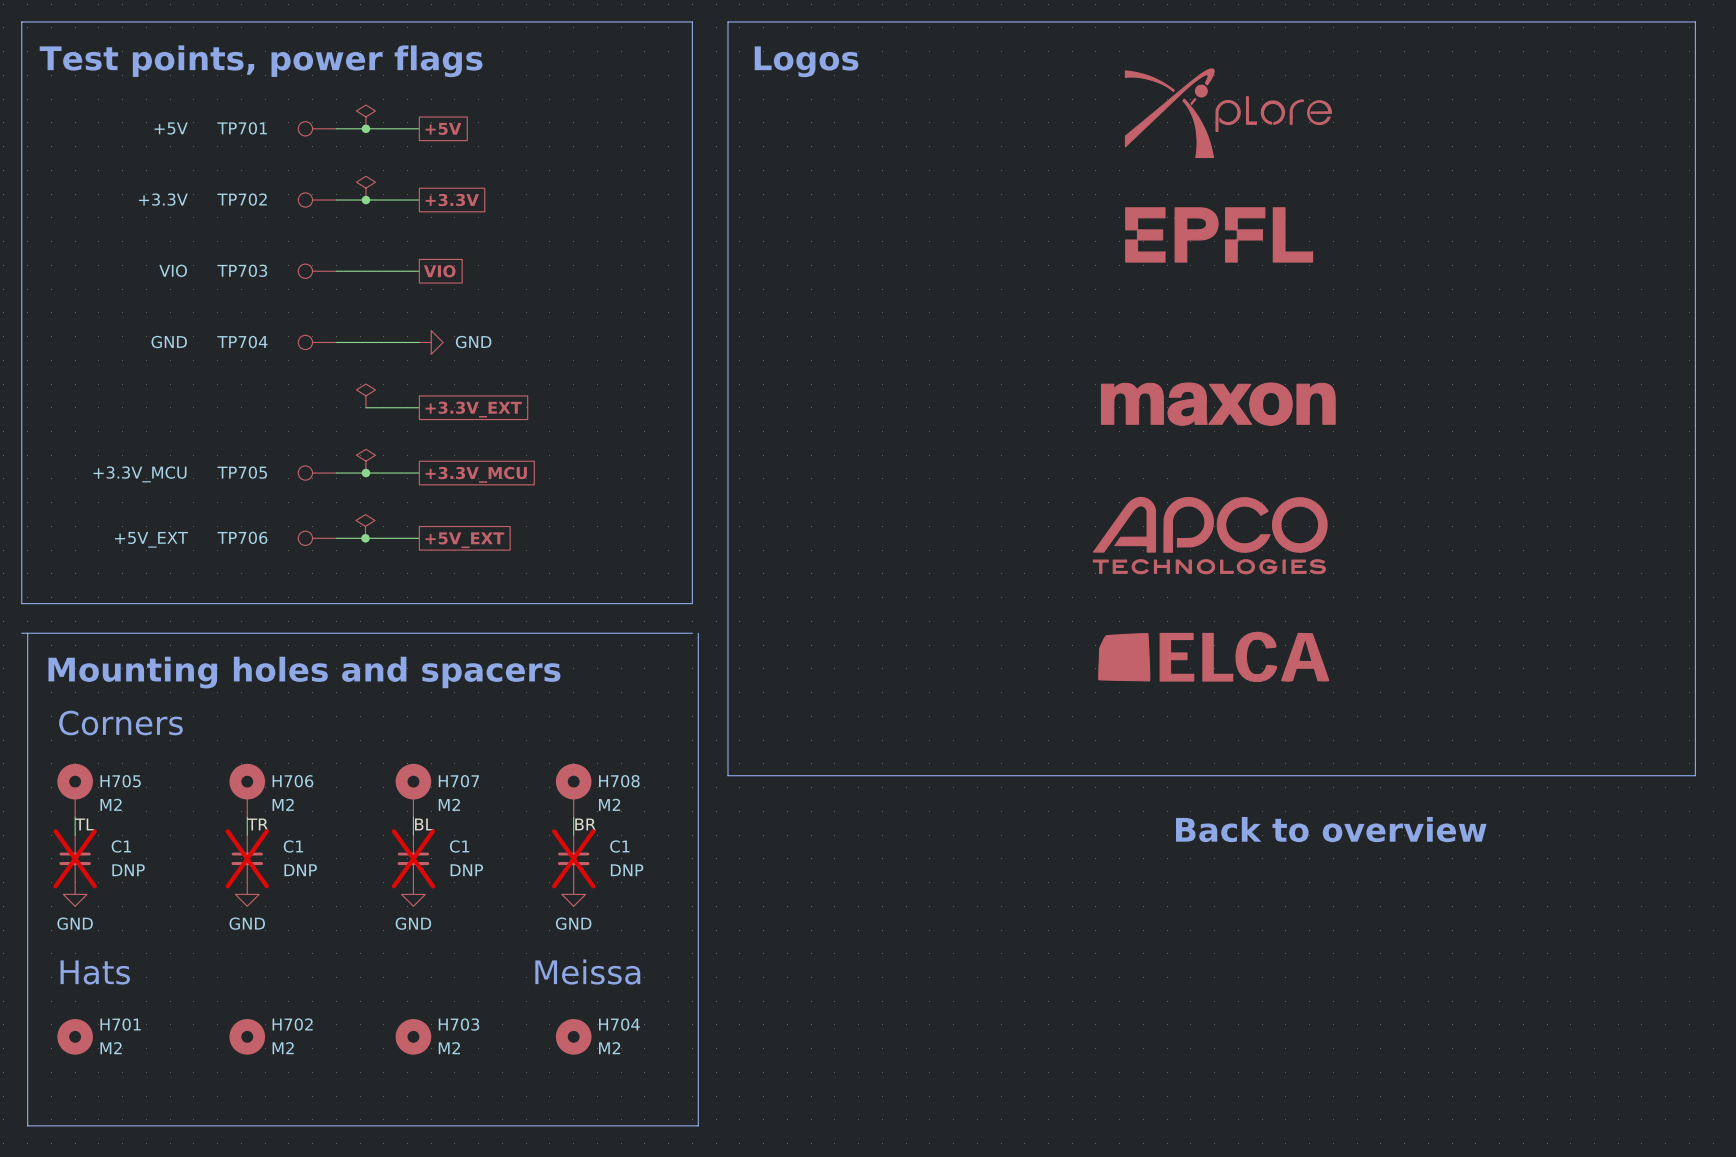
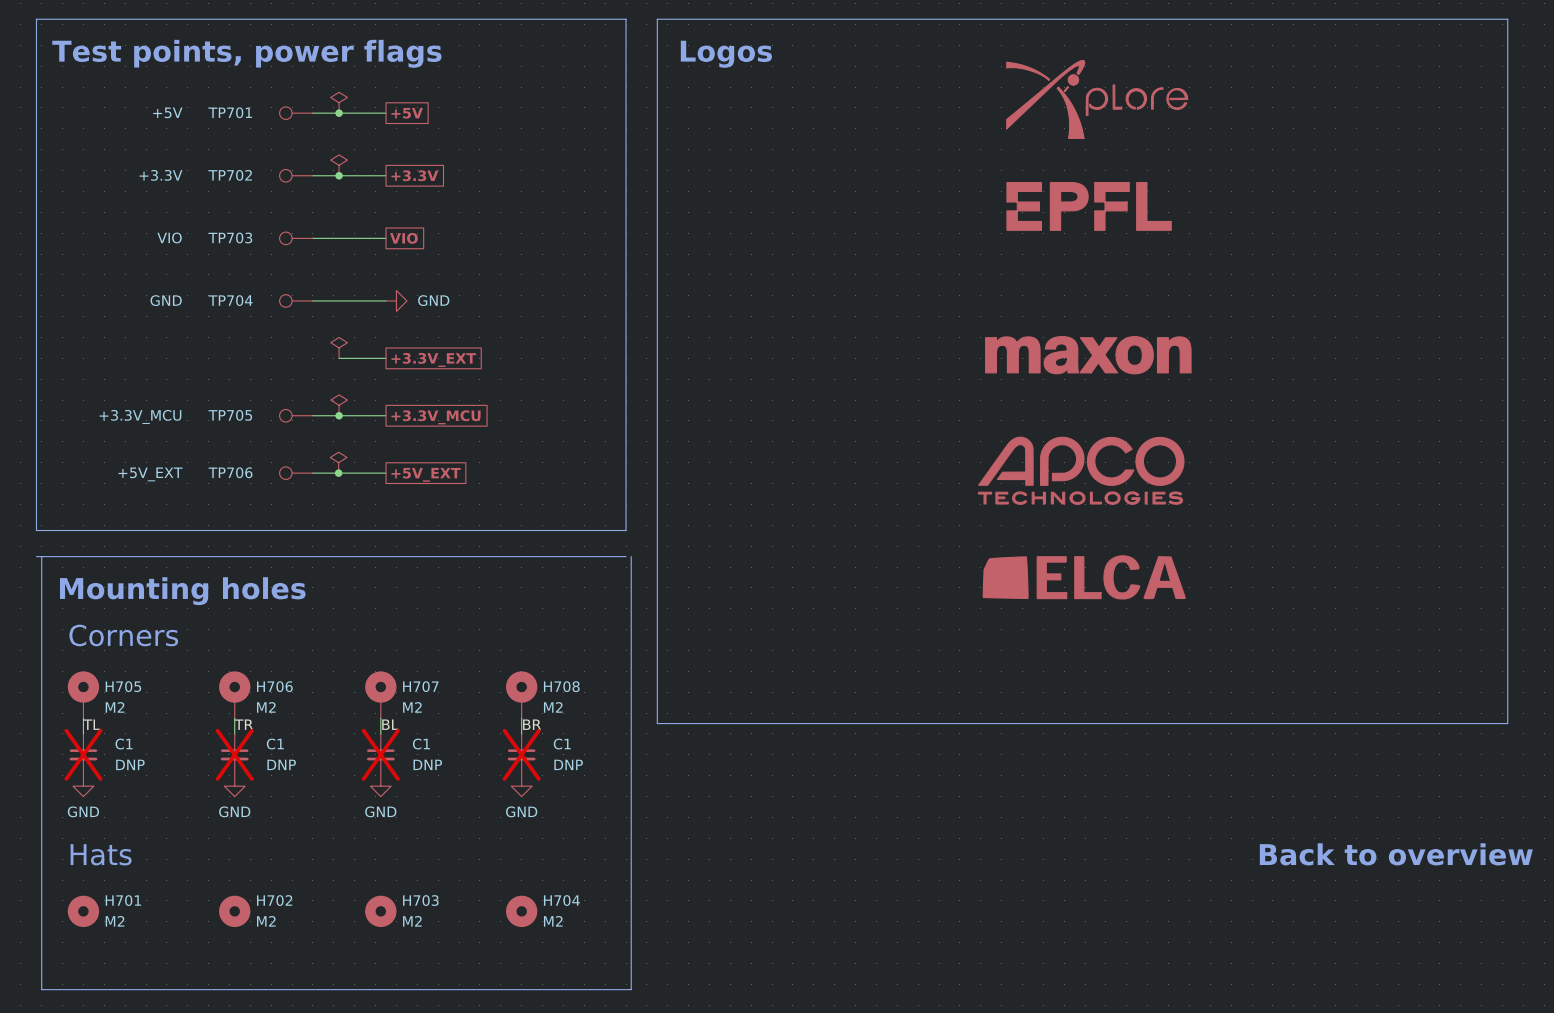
text: Mounting holes and spacers (304, 672) -> Mounting holes (182, 591)
line: (727, 775) (1695, 775) -> (657, 681) (657, 723) (1507, 723) (1507, 681)
text: Back to overview (1331, 829) -> none
text: Meissa (587, 971) -> none
text: none -> Back to overview (1396, 854)

